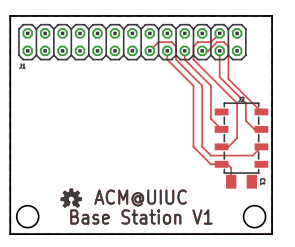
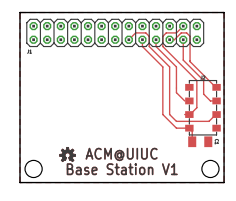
part footprint: [214, 102, 269, 174] -> [185, 80, 221, 136]

